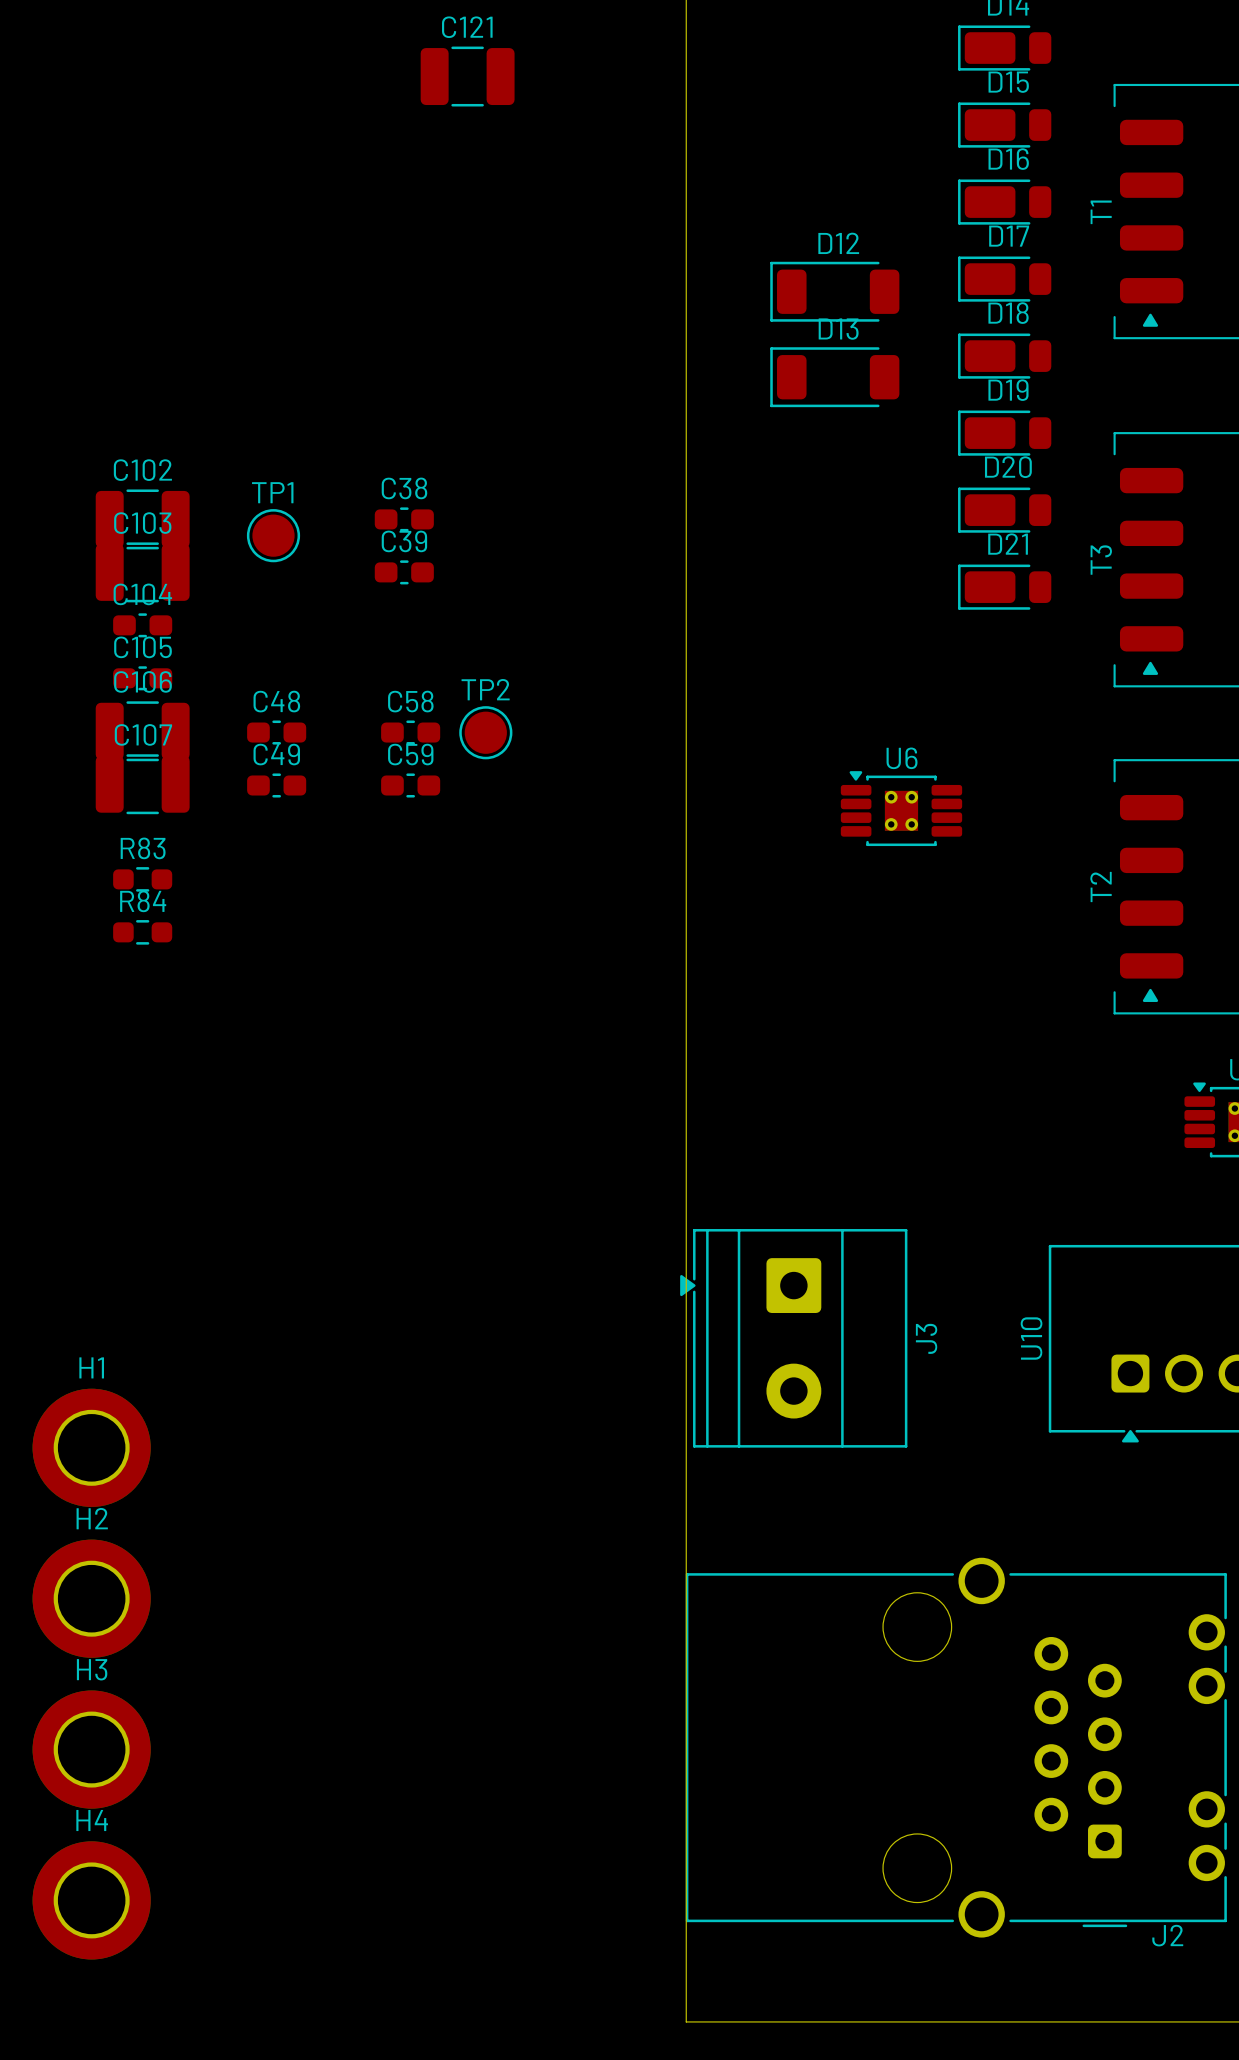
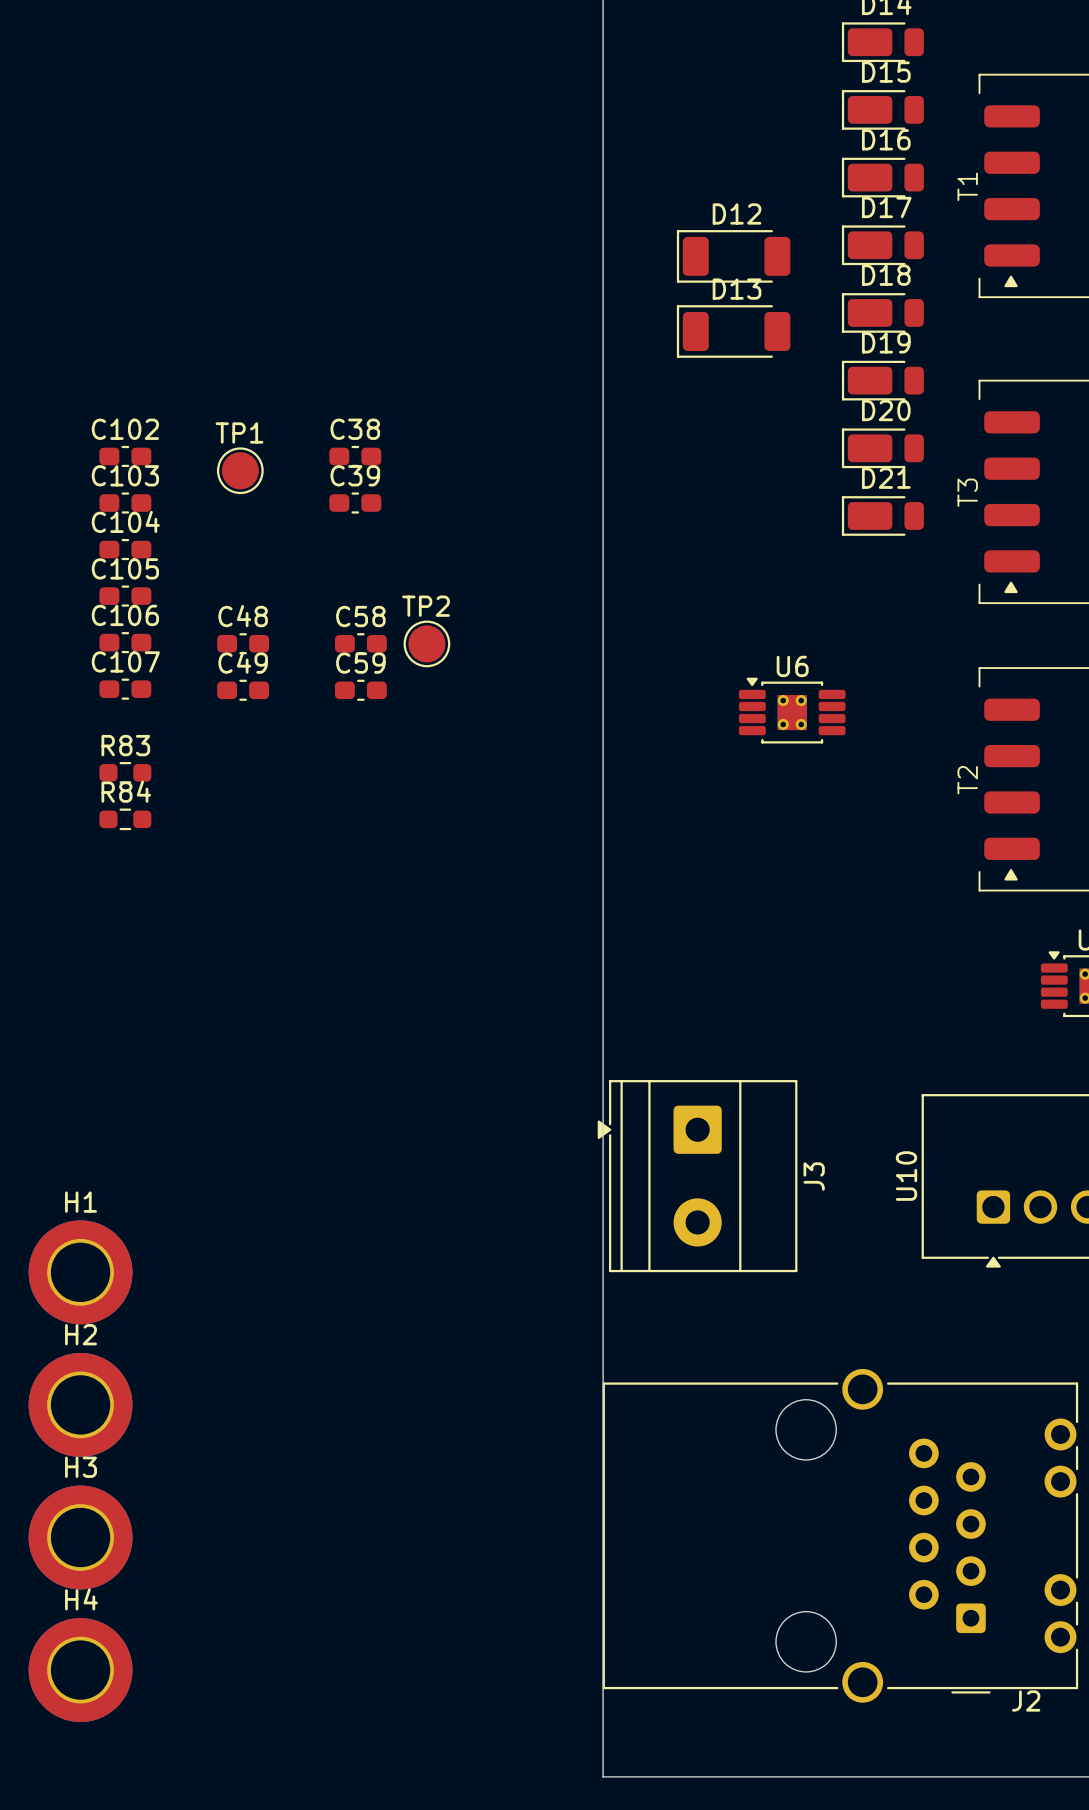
C121: (467, 76) -> none
C102 footprint: [95, 489, 190, 550] -> [99, 445, 152, 468]
C103 footprint: [95, 542, 190, 603] -> [99, 492, 152, 514]
C106 footprint: [95, 701, 190, 762] -> [99, 632, 152, 654]
C107 footprint: [95, 754, 190, 815] -> [99, 678, 152, 700]

